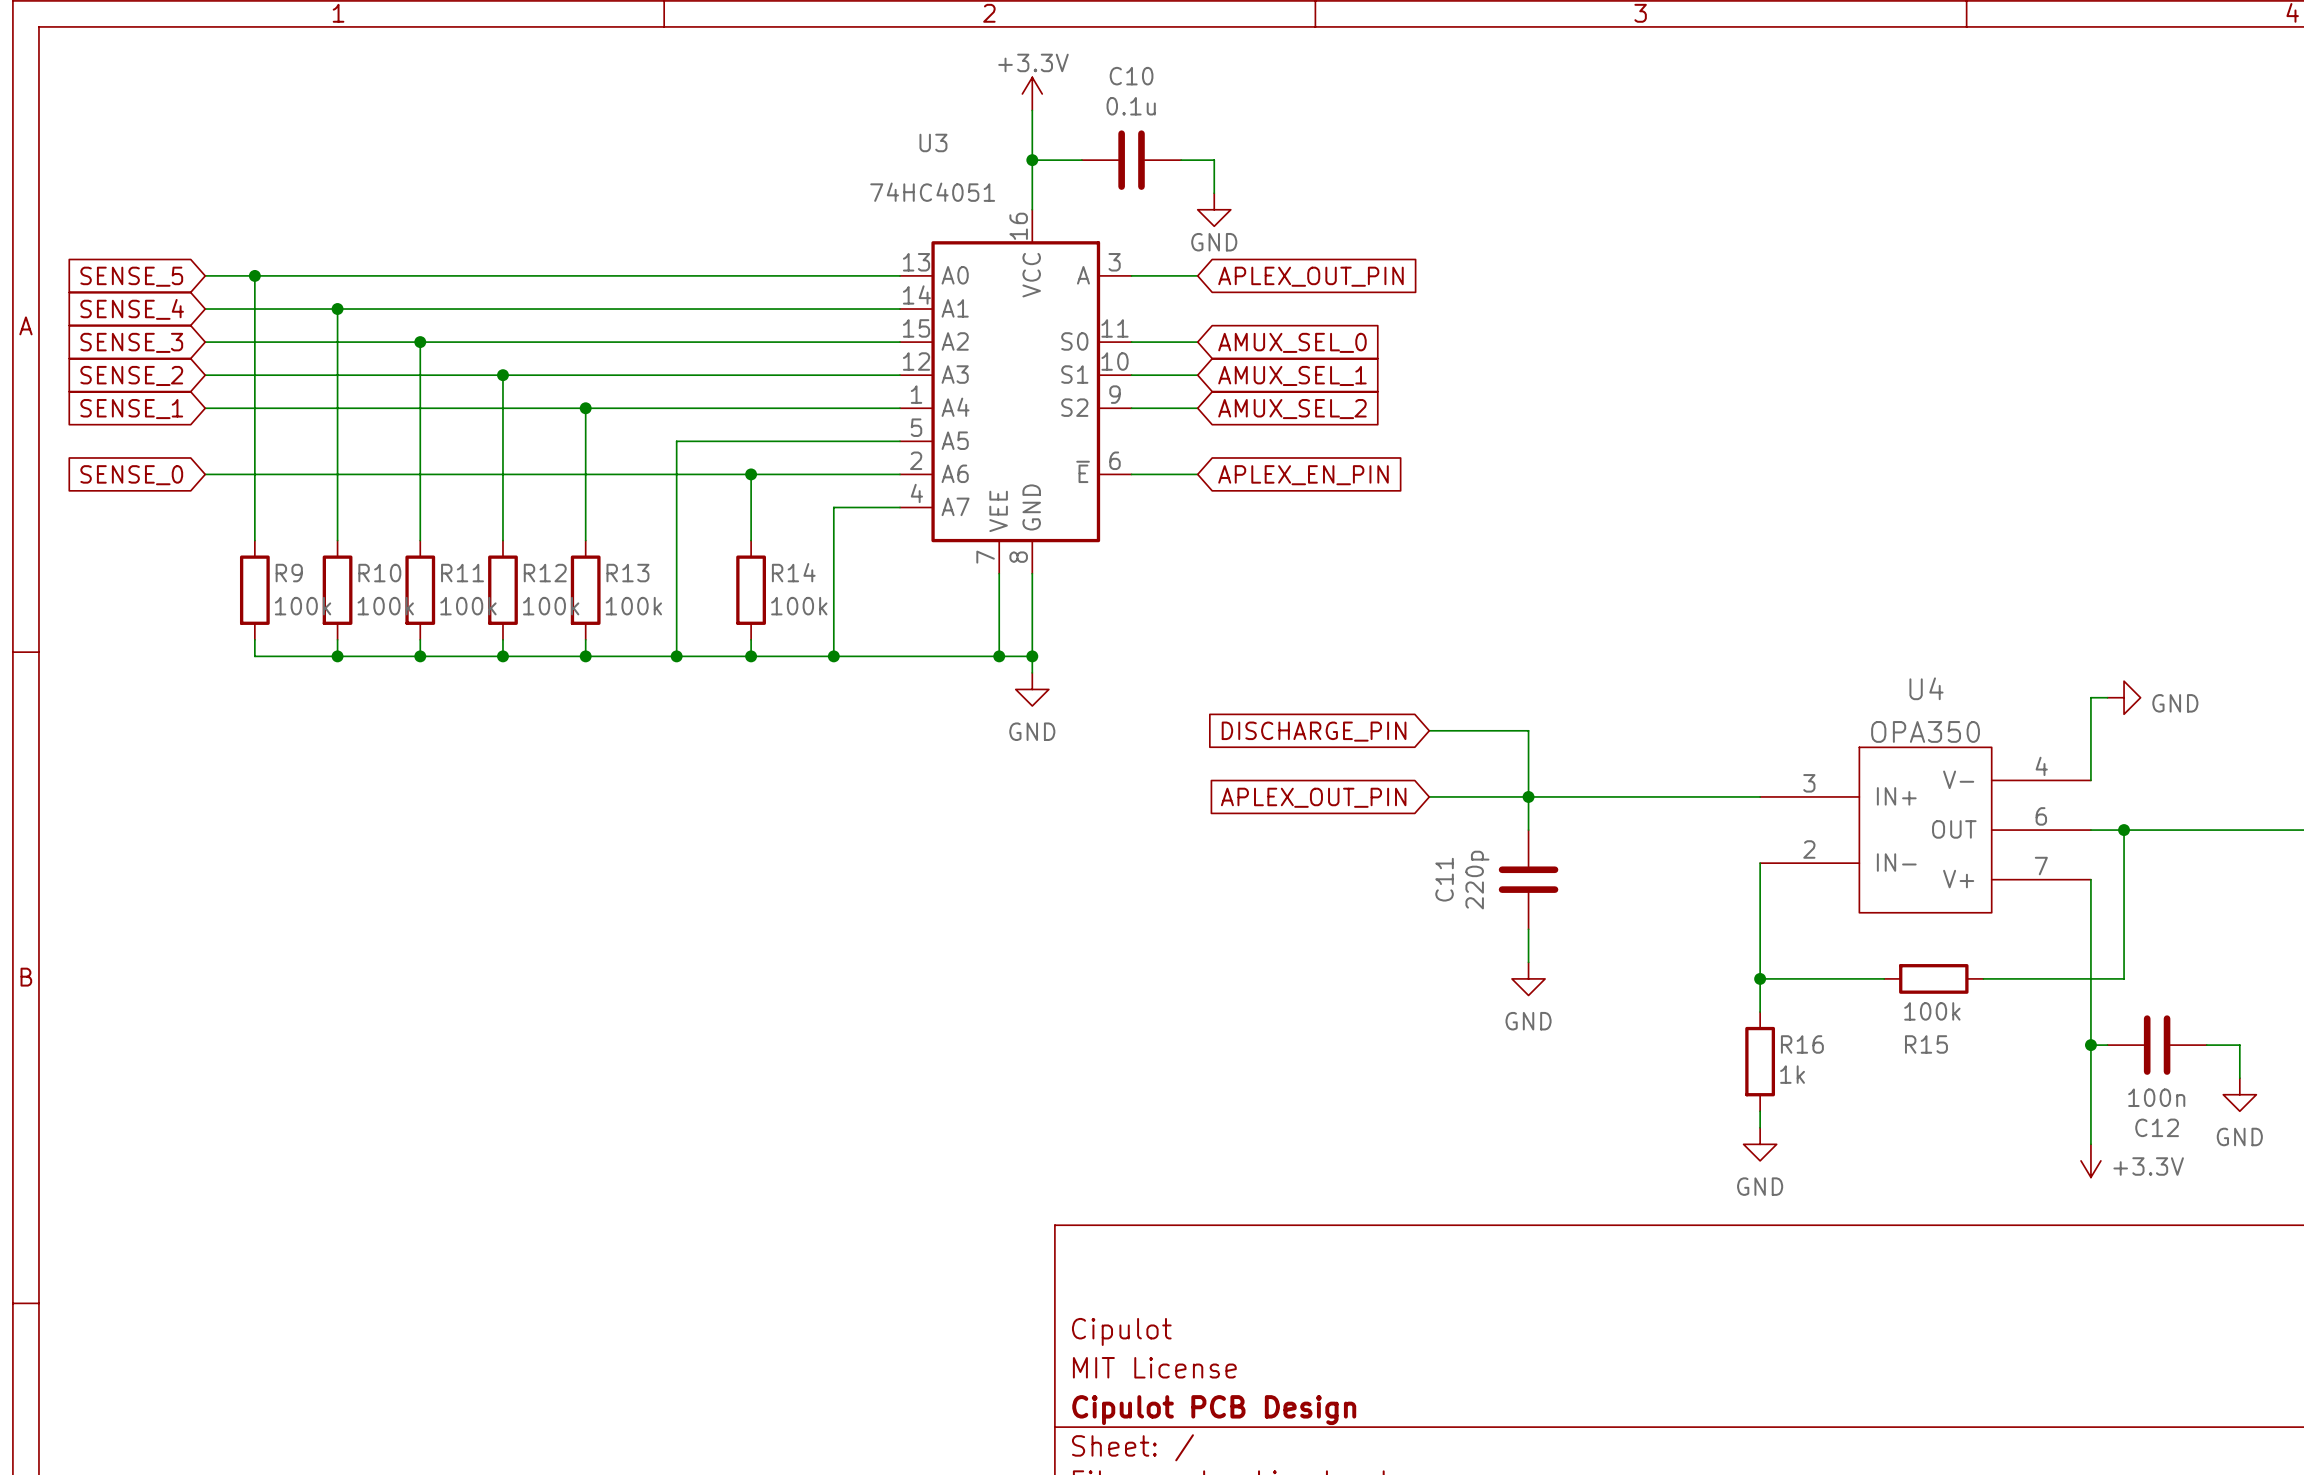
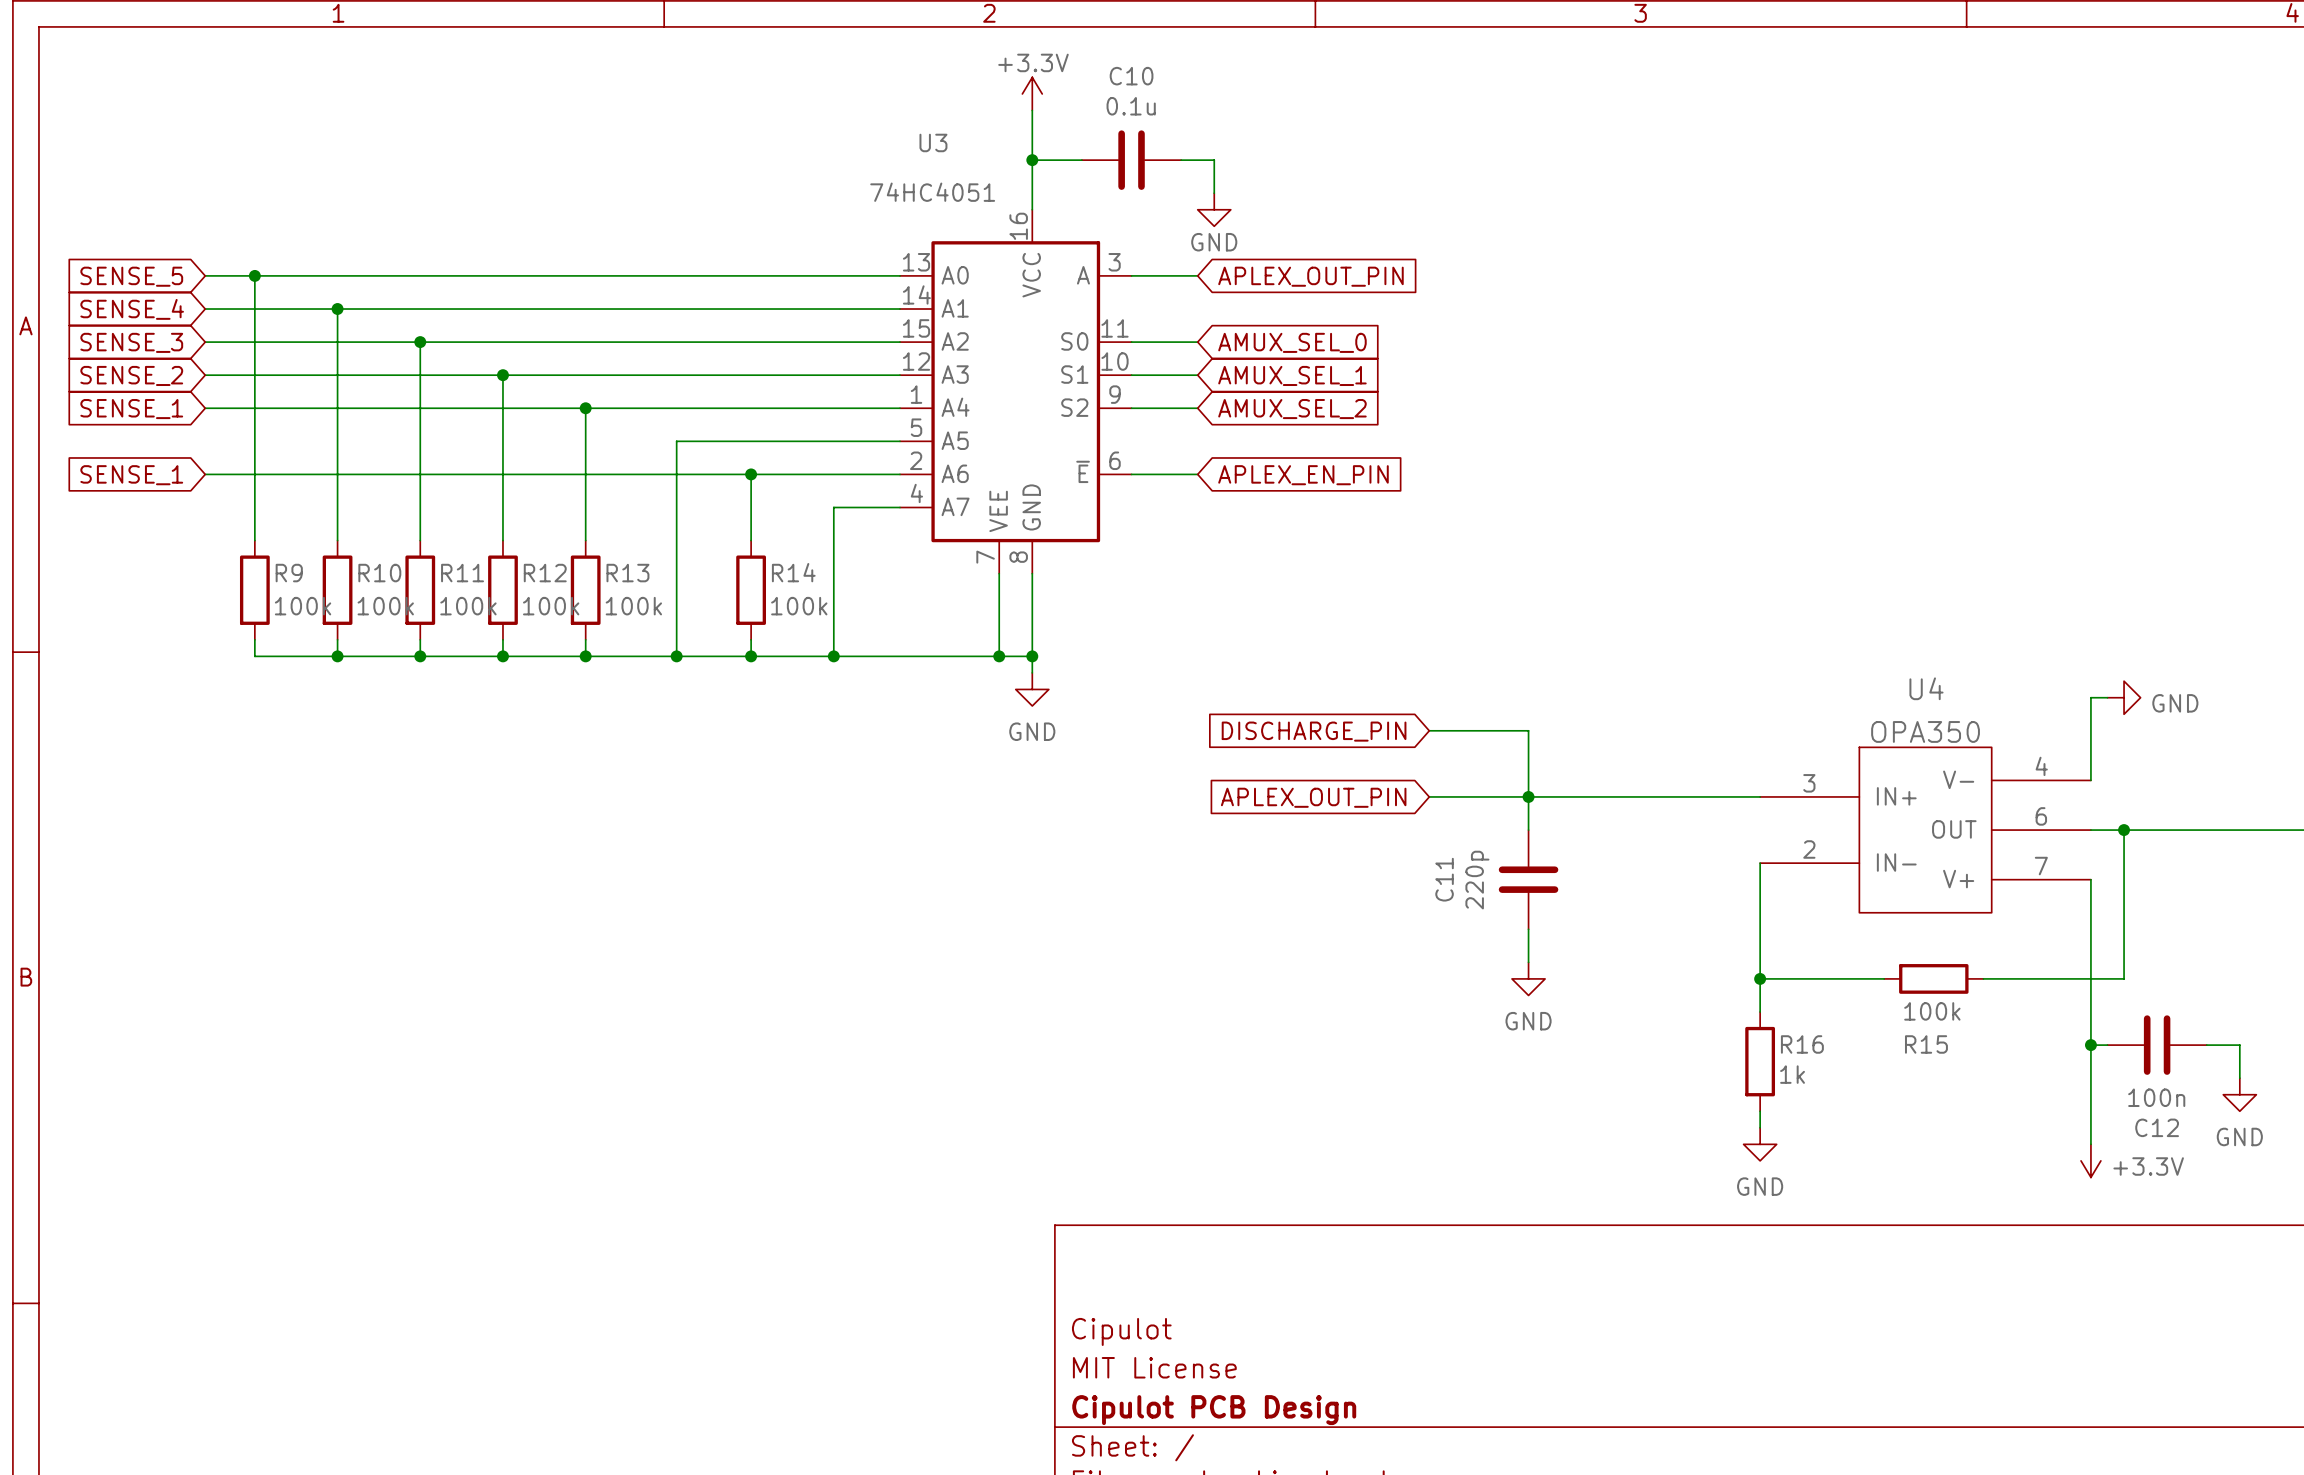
global label: SENSE_0 (131, 475) -> SENSE_1 (131, 475)

